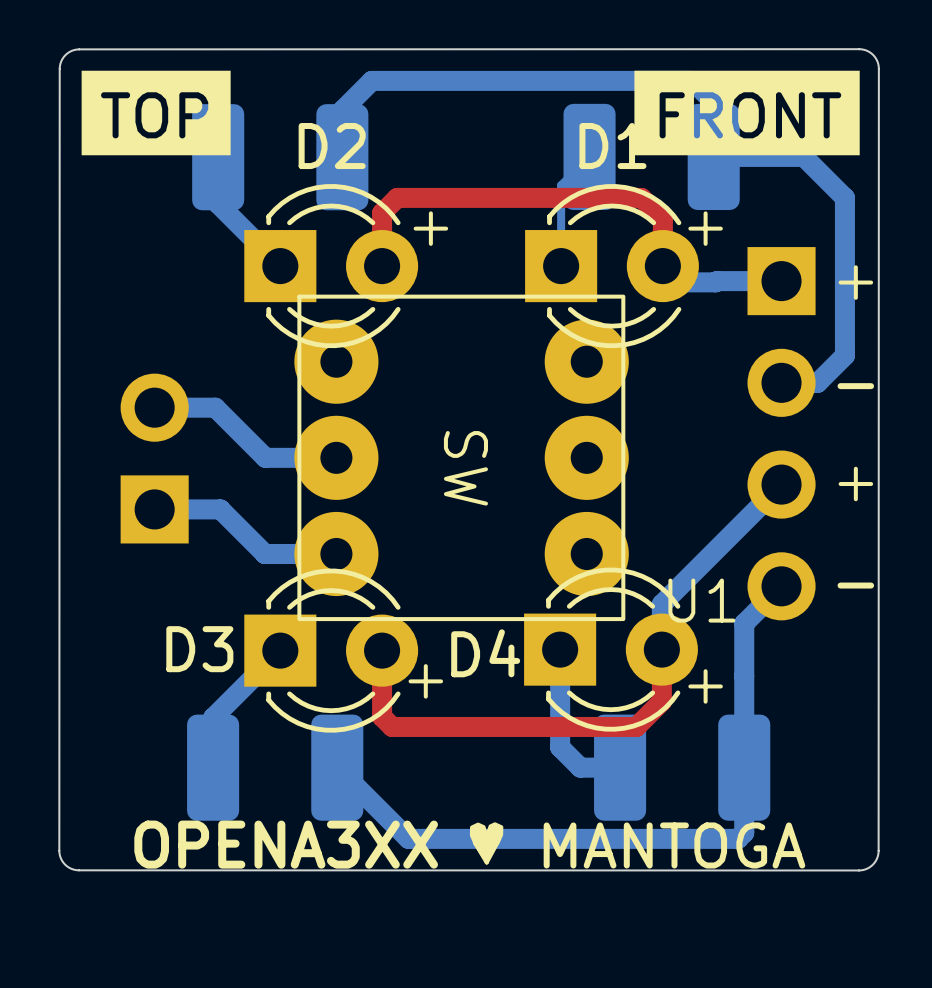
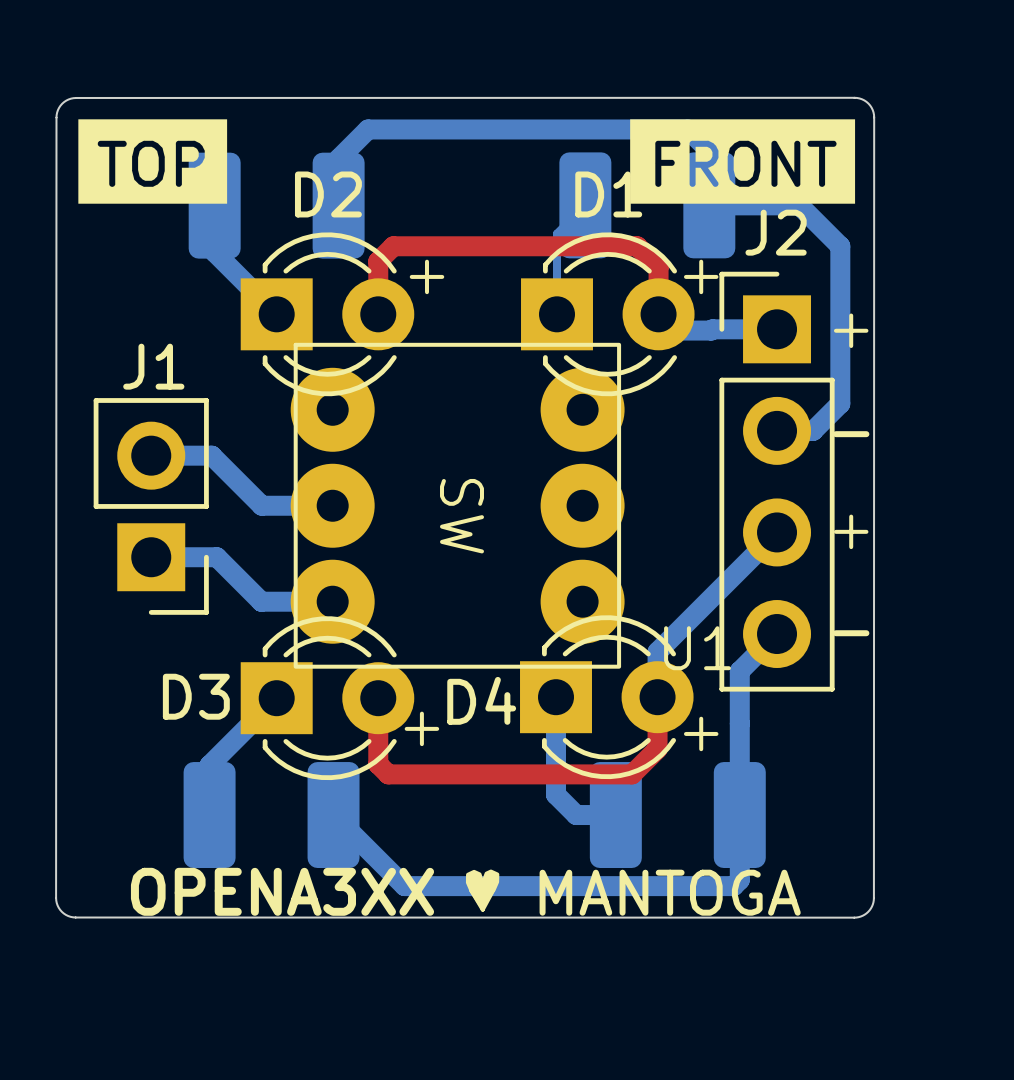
J2 side: bottom (781, 433) -> top (777, 481)
J1 side: bottom (154, 458) -> top (151, 506)

